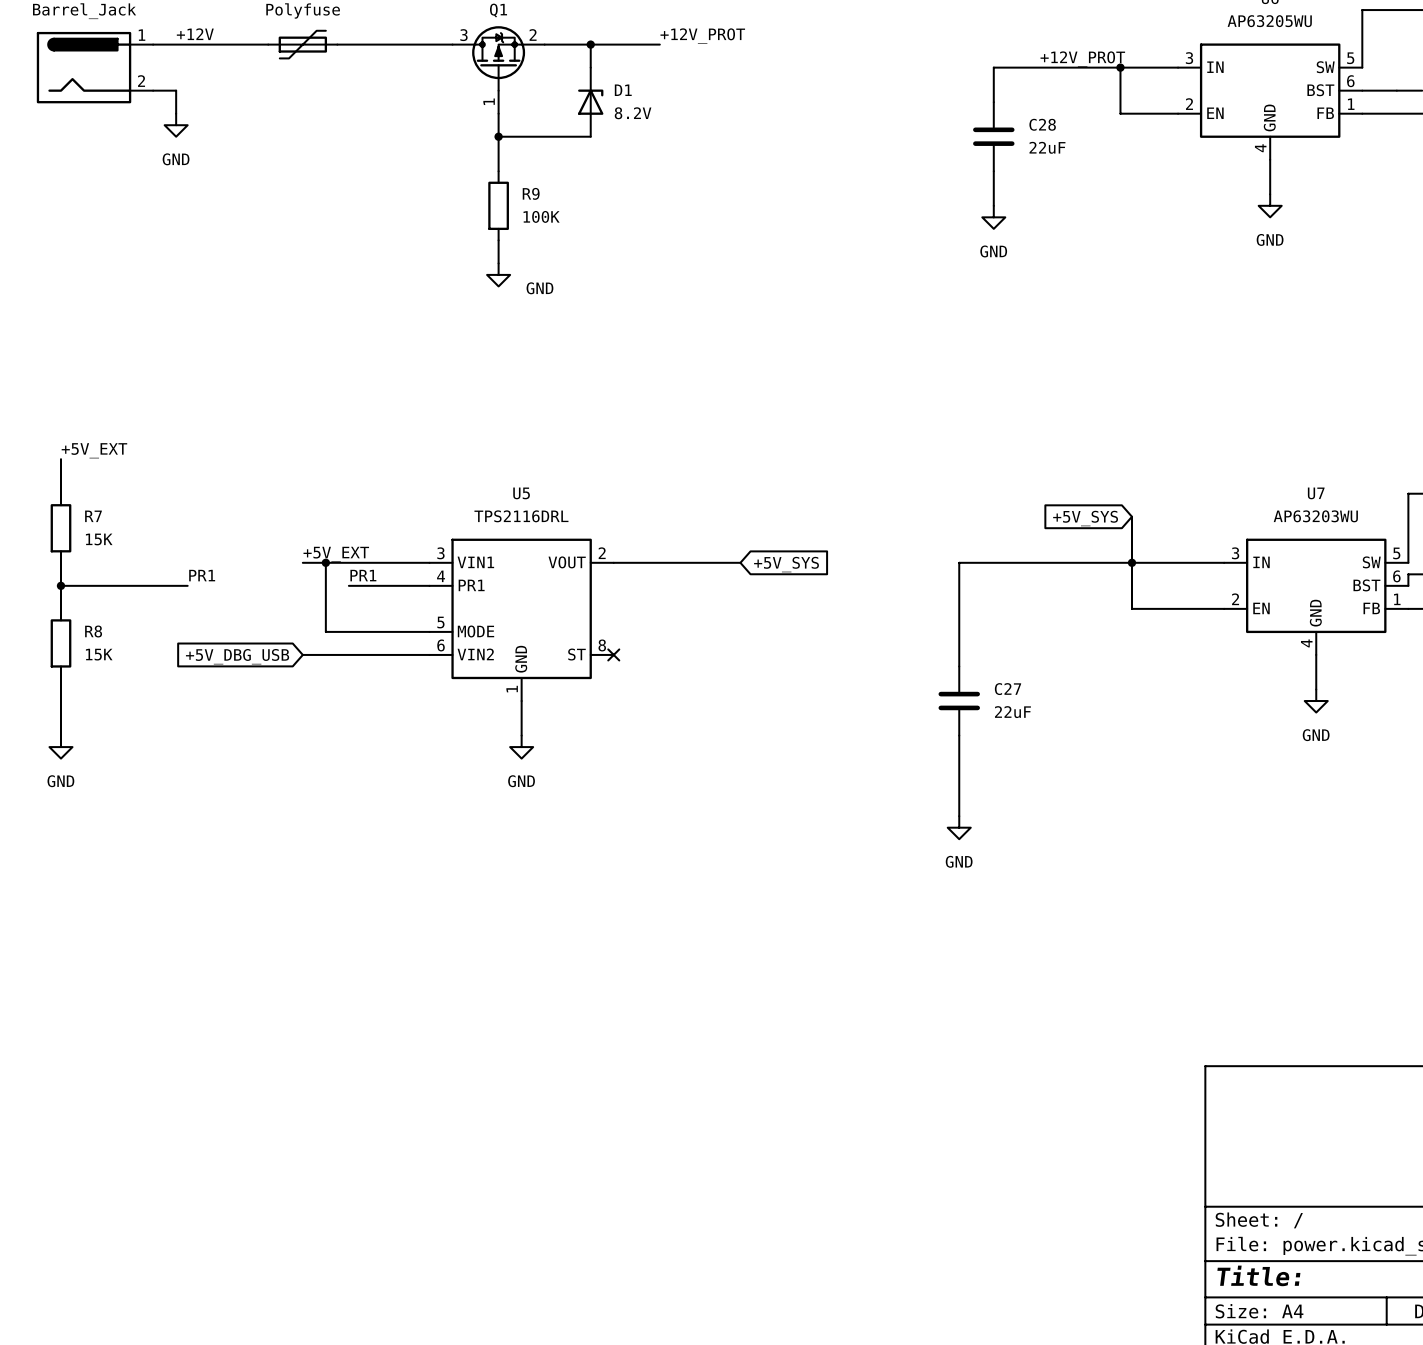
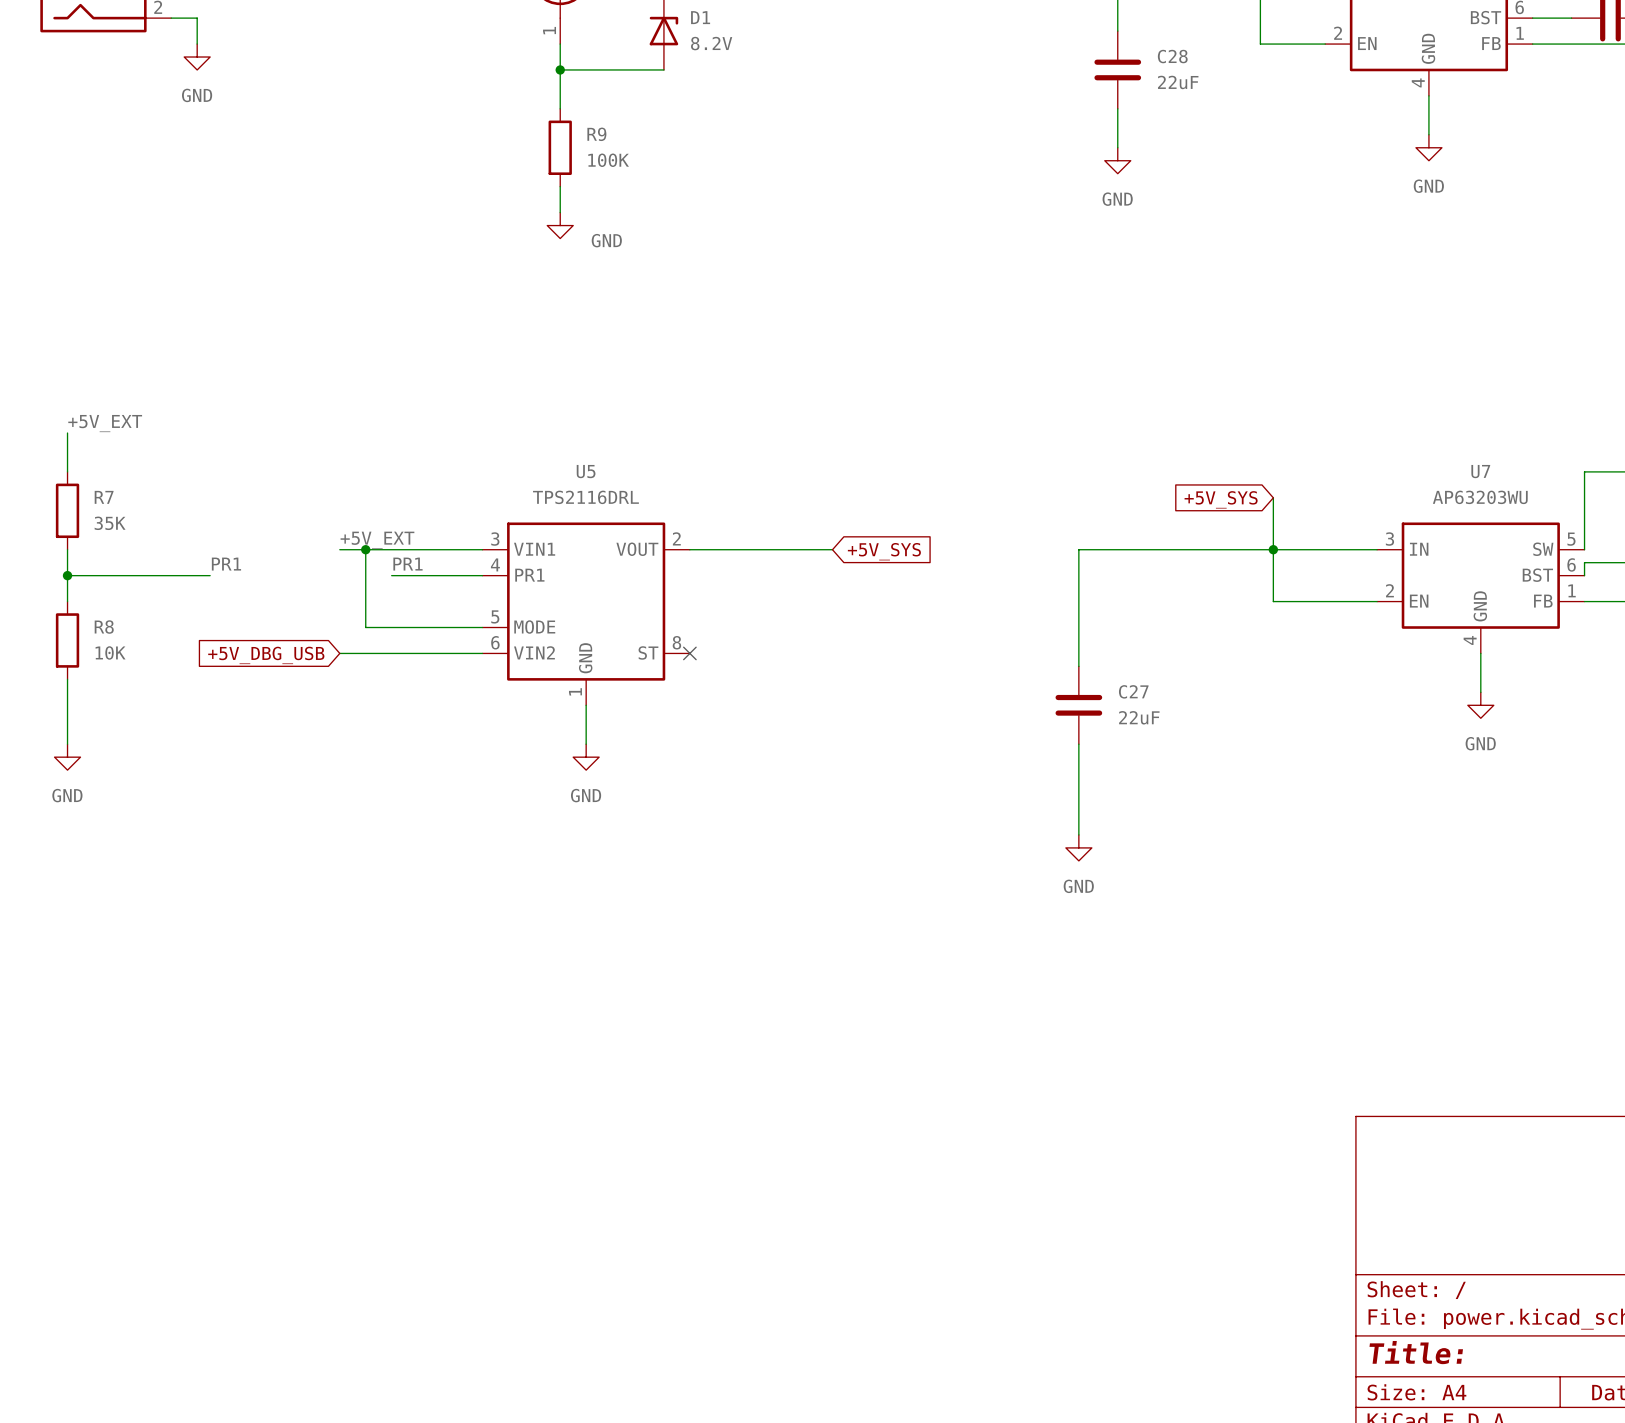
R7 value: 15K (99, 539) -> 35K (110, 523)
R8 value: 15K (99, 654) -> 10K (110, 652)

